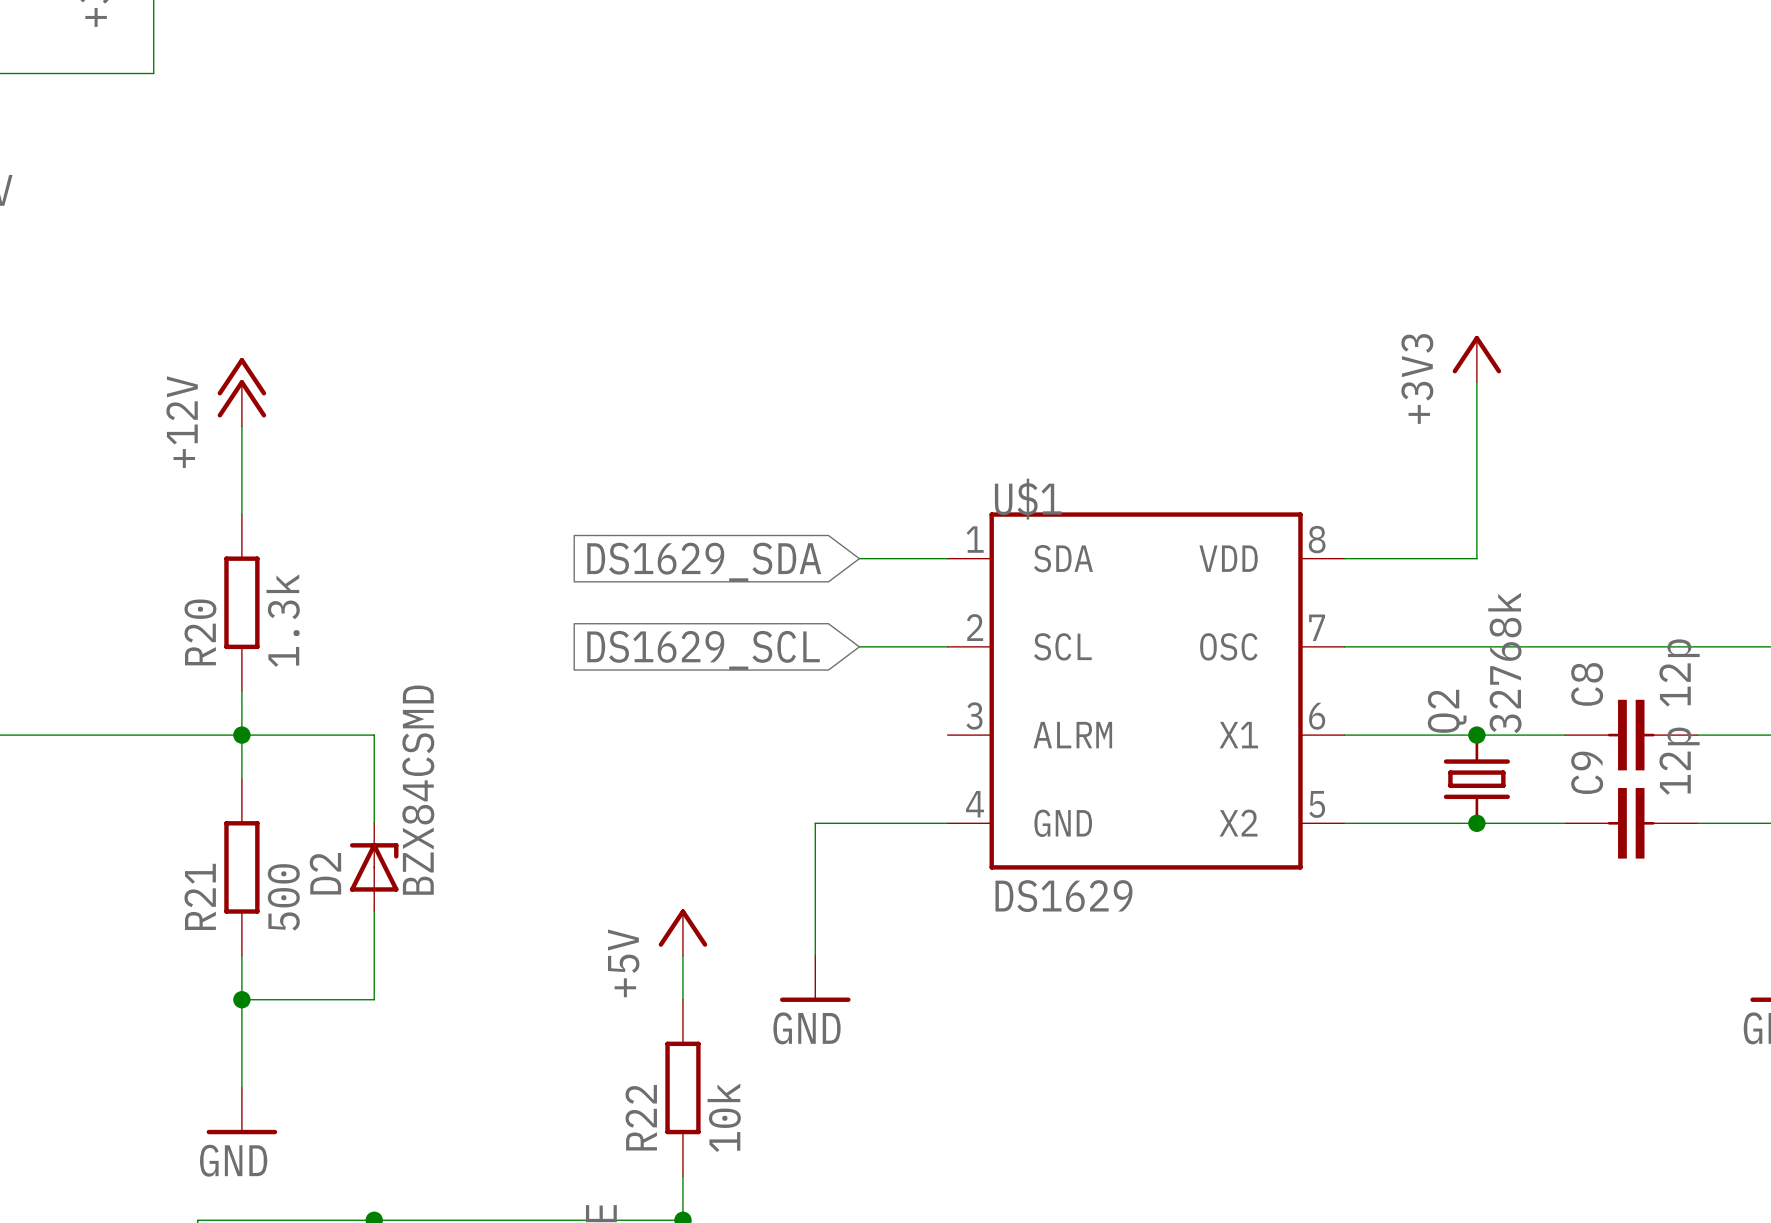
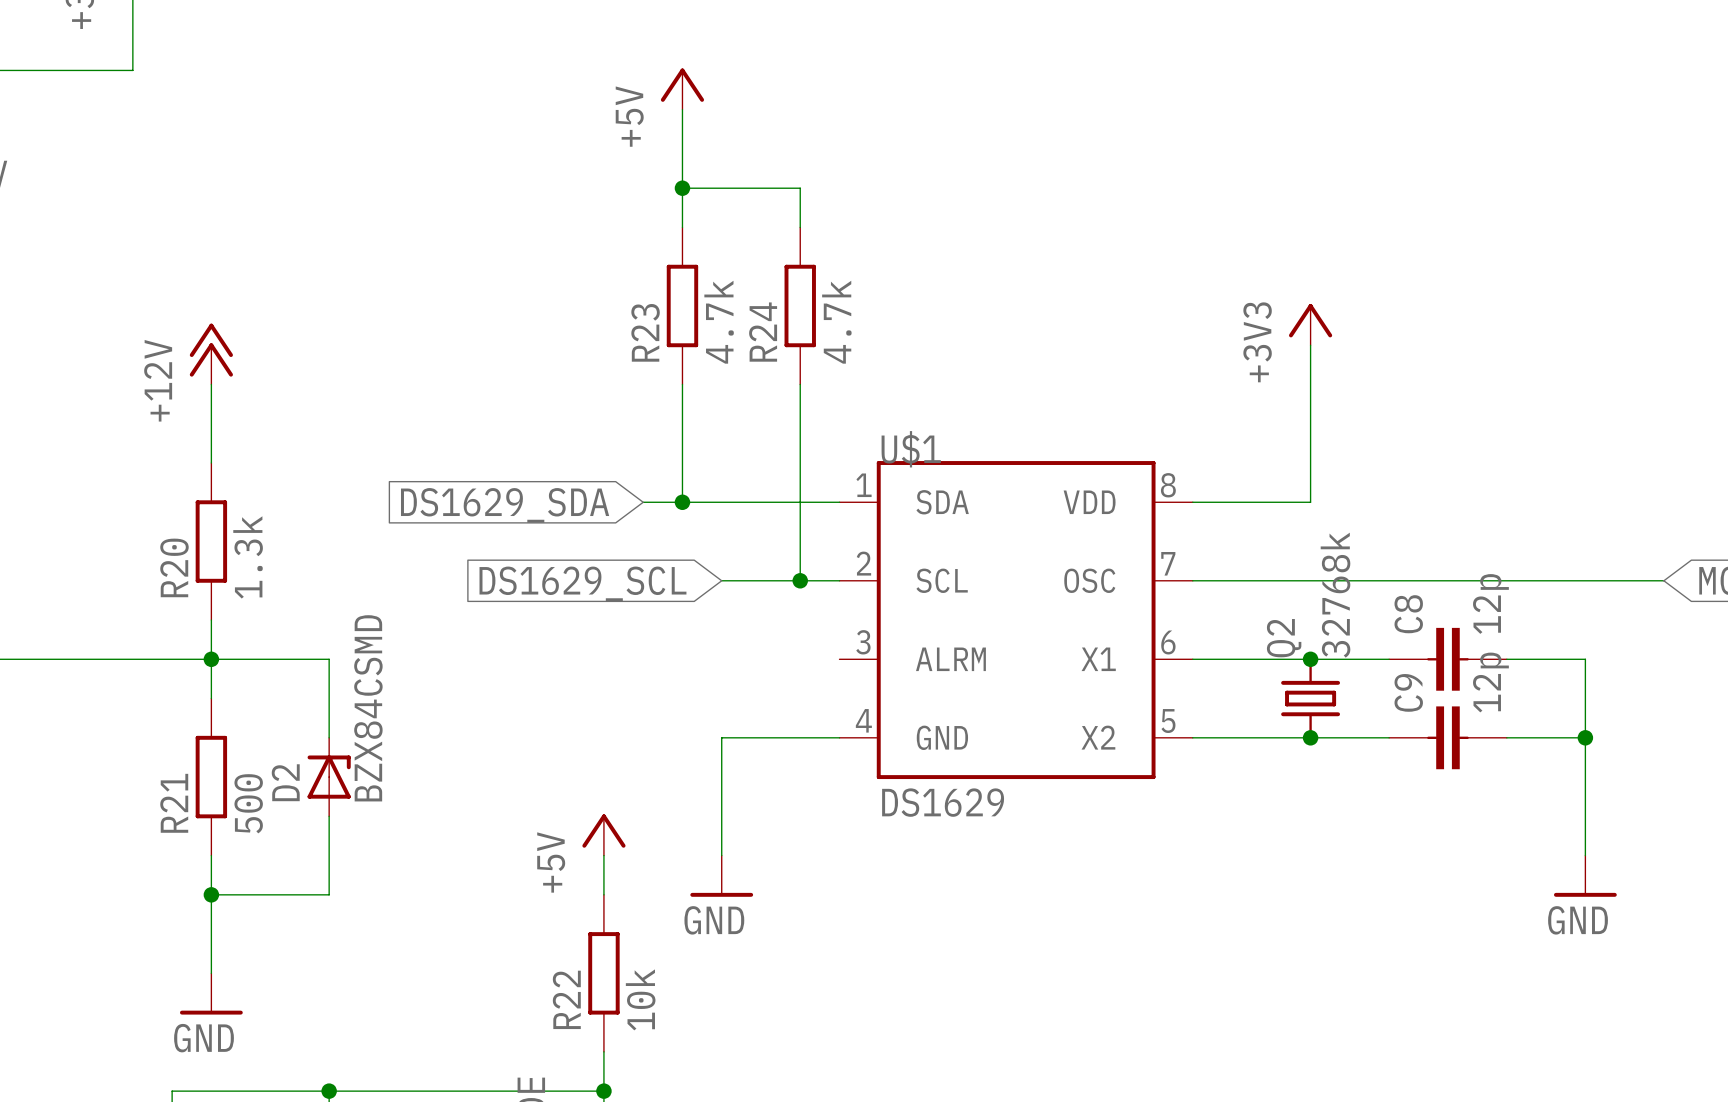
power symbol: none -> +5V (682, 89)
wire: none -> (682, 109) (682, 227)
wire: none -> (682, 188) (800, 188) (800, 227)
junction: none -> (682, 188)
R23: none -> 4.7k (682, 305)
R24: none -> 4.7k (800, 305)
wire: none -> (682, 384) (682, 502)
wire: none -> (800, 384) (800, 580)
wire: none -> (643, 502) (760, 502)
junction: none -> (682, 502)
global label position: DS1629_SDA (704, 562) -> DS1629_SDA (505, 505)
wire: none -> (721, 580) (760, 580)
junction: none -> (800, 580)
global label position: DS1629_SCL (703, 650) -> DS1629_SCL (582, 583)

